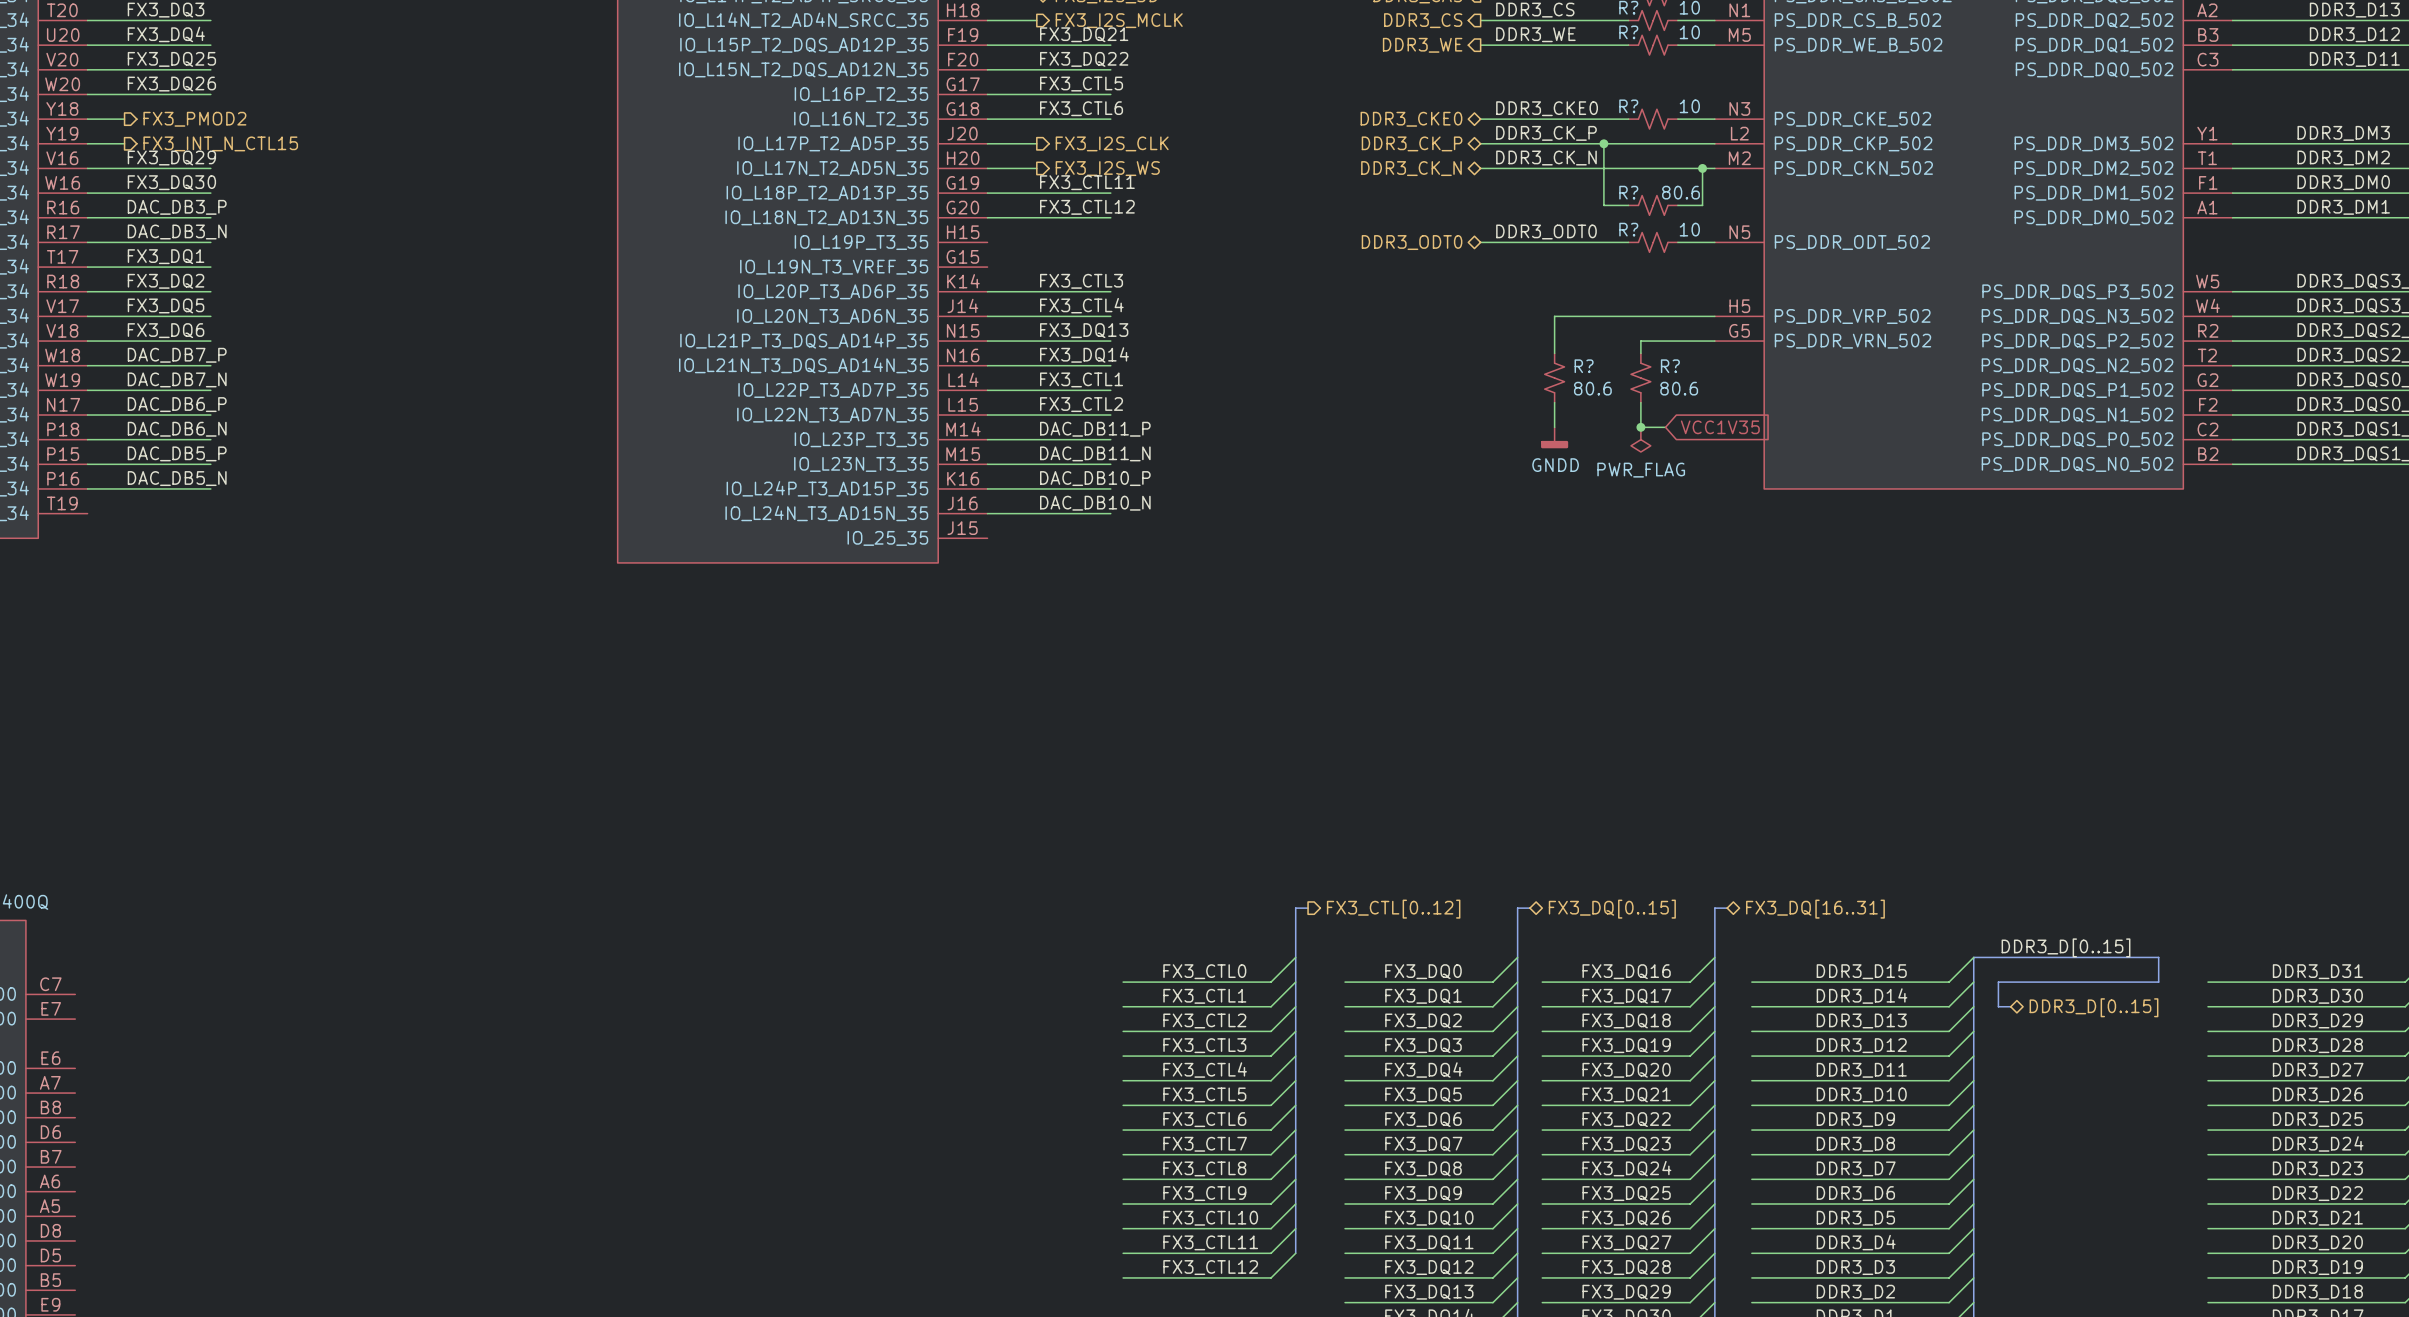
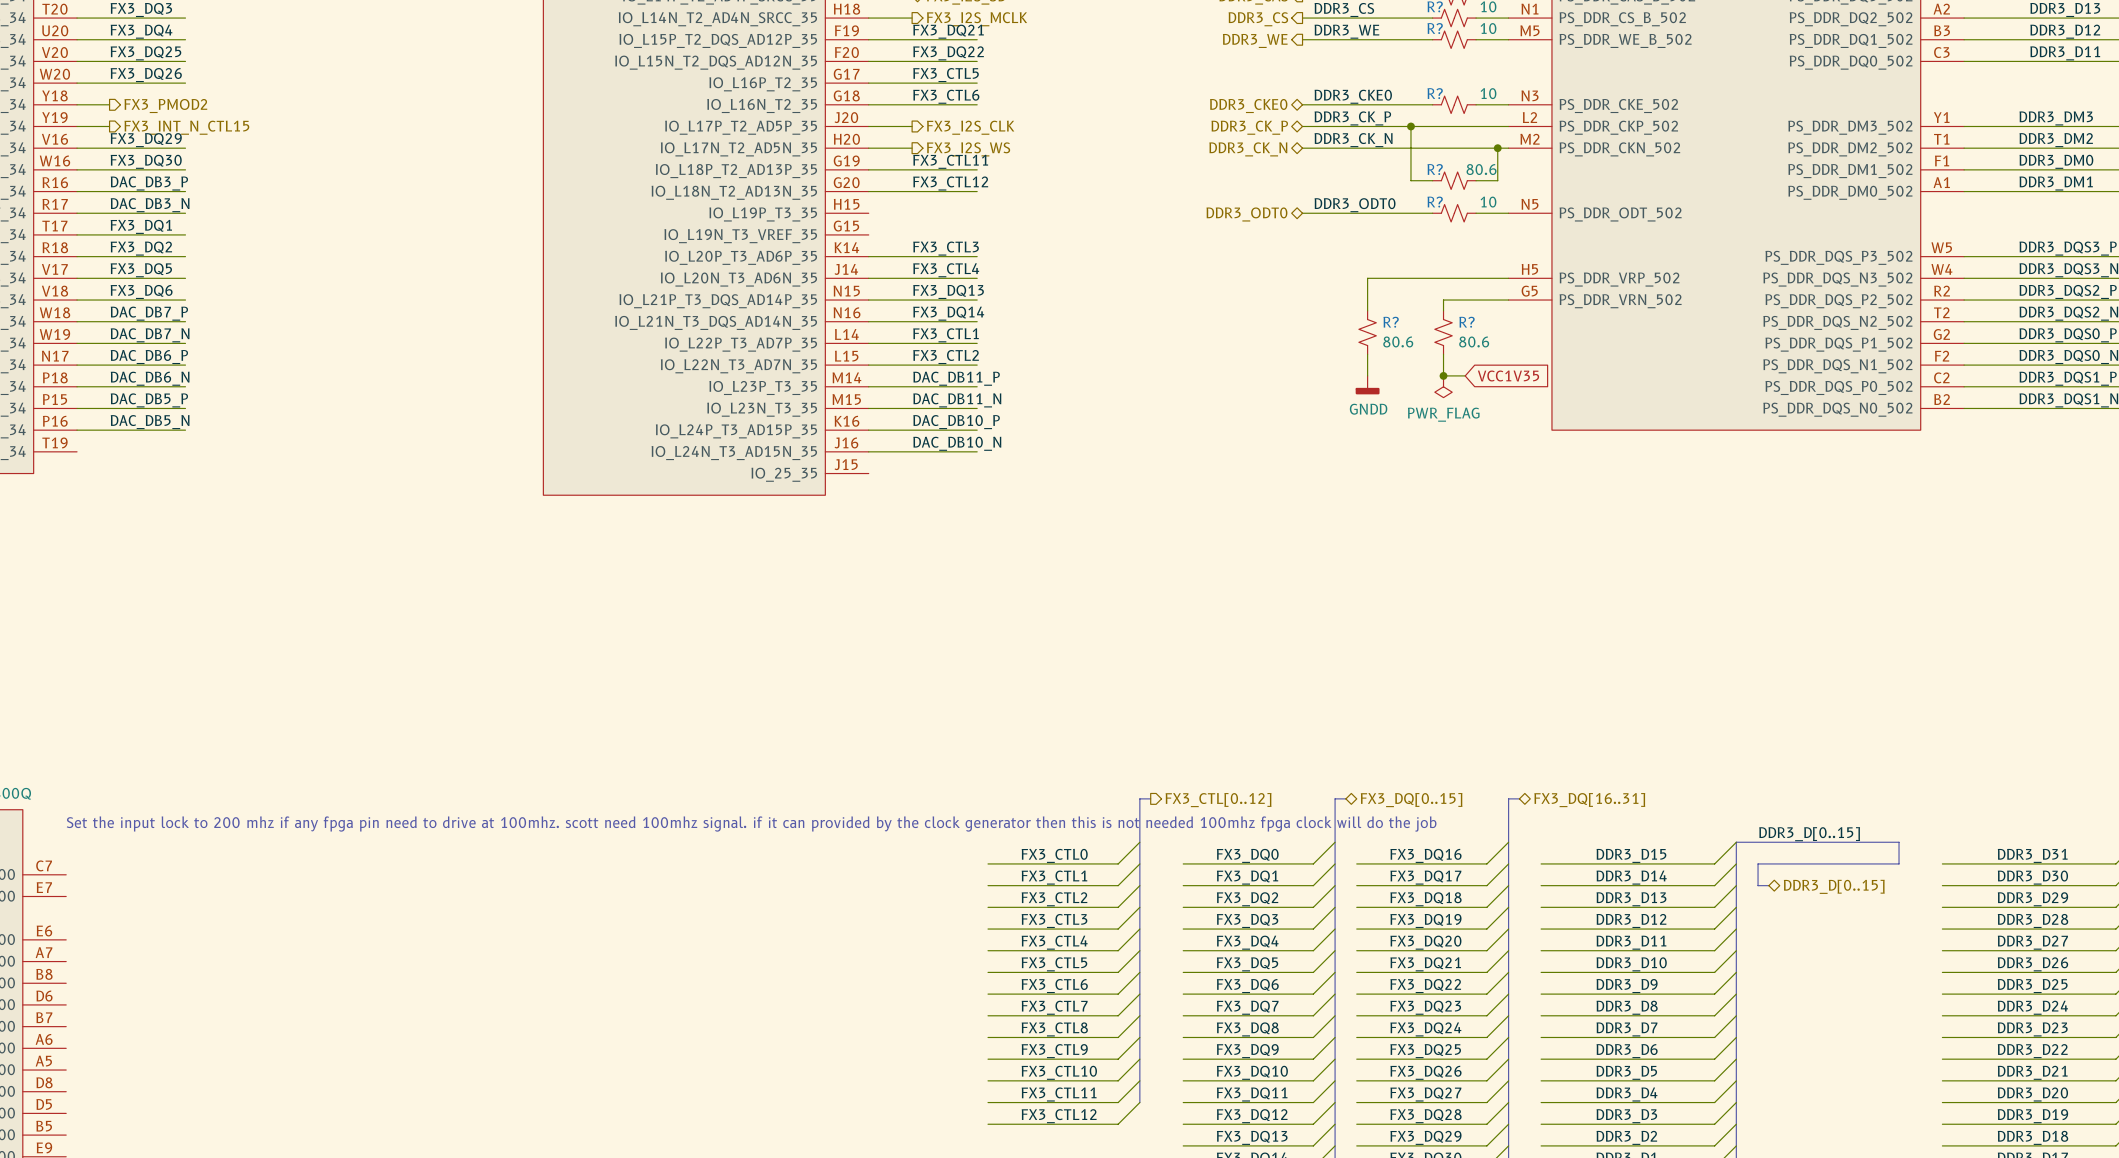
text: none -> Set the input lock to 200 mhz if any fpga pin need to drive at 100mhz. scott need 100mhz signal. if it can provided by the clock generator then this is not needed 100mhz fpga clock will do the job (751, 824)

